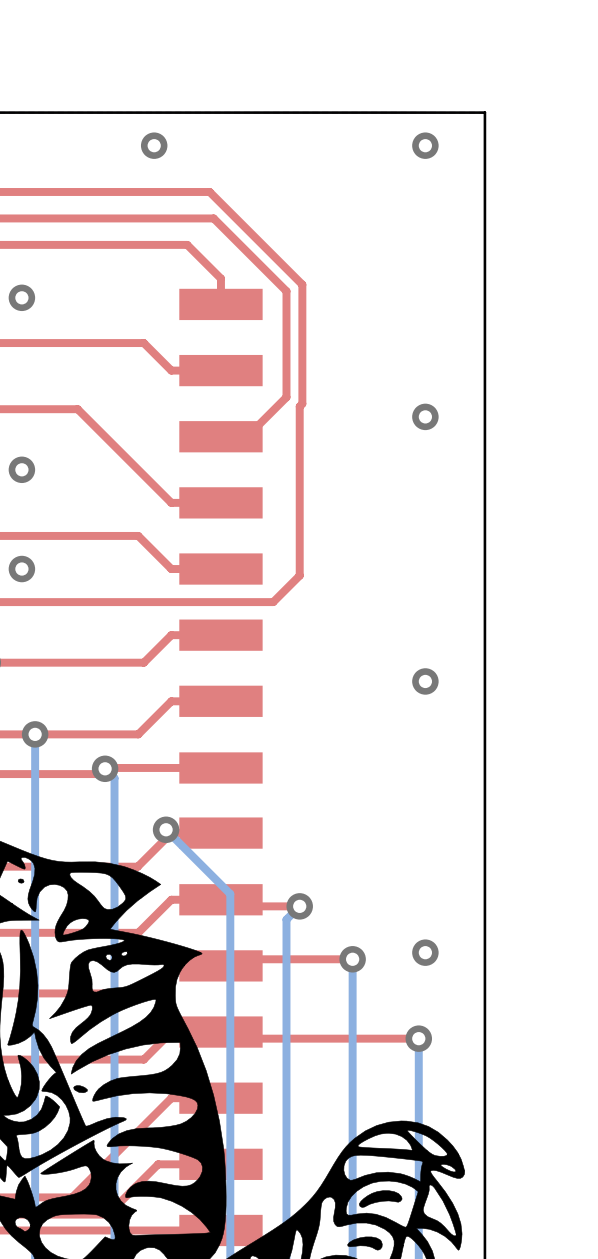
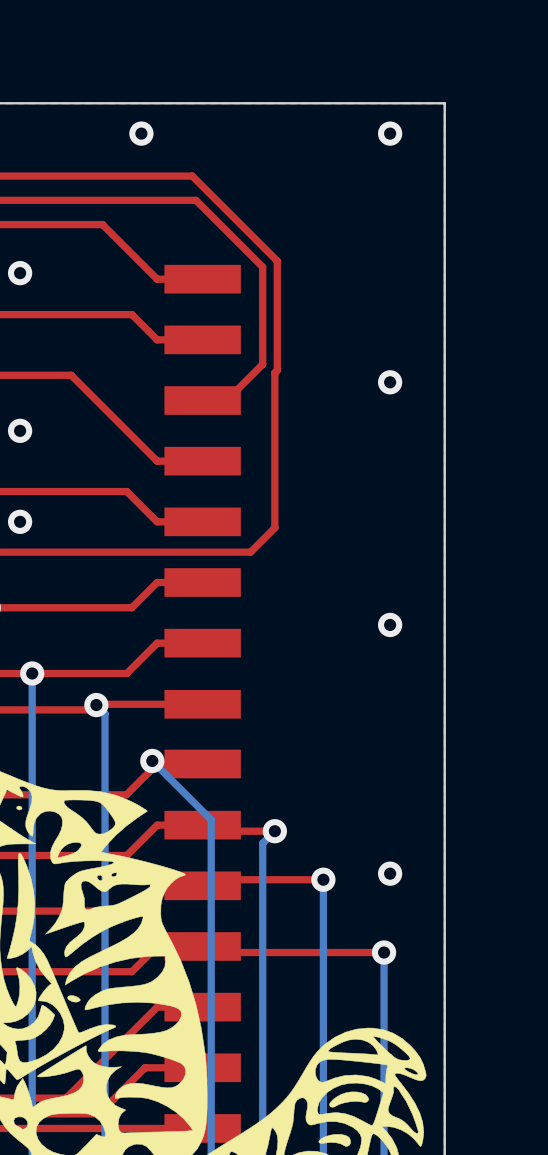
top track: (111, 244) (187, 244) (220, 278) (220, 304) -> (102, 224) (157, 279) (202, 279)

